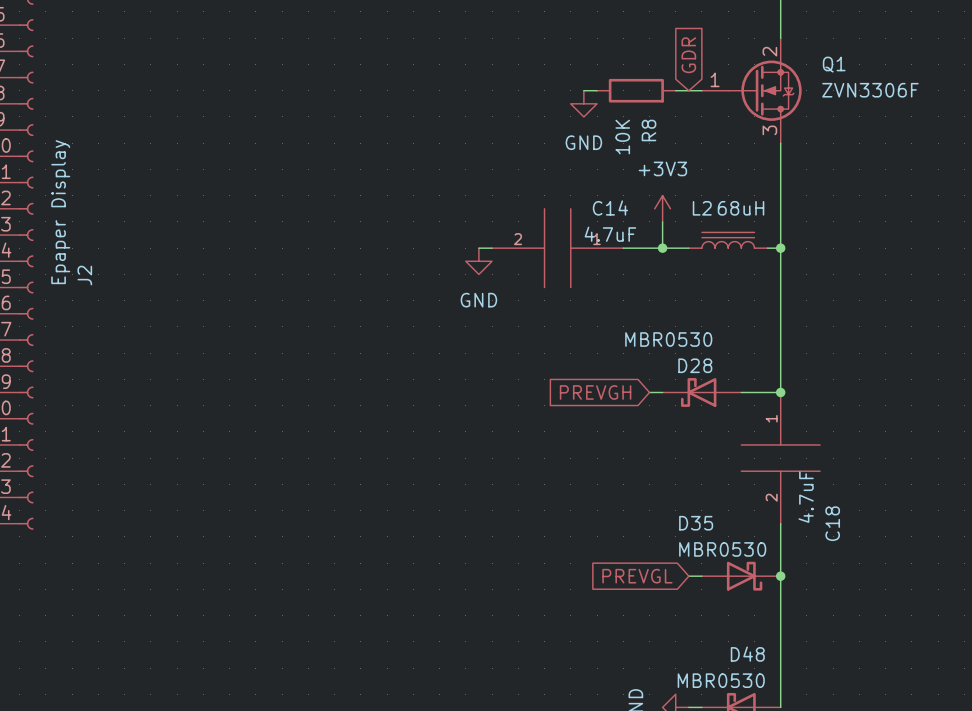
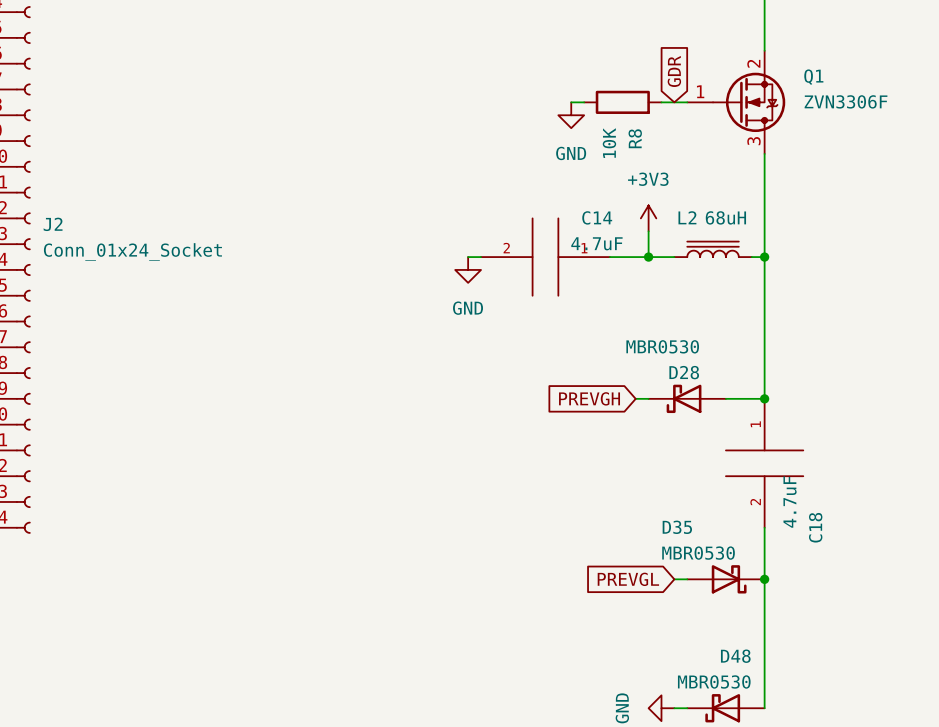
J2 value: Epaper Display (60, 212) -> Conn_01x24_Socket (132, 251)
J2 name rotation: 0° (84, 275) -> 90° clockwise (53, 224)
J2 name position: J2 (84, 275) -> J2 (53, 224)

